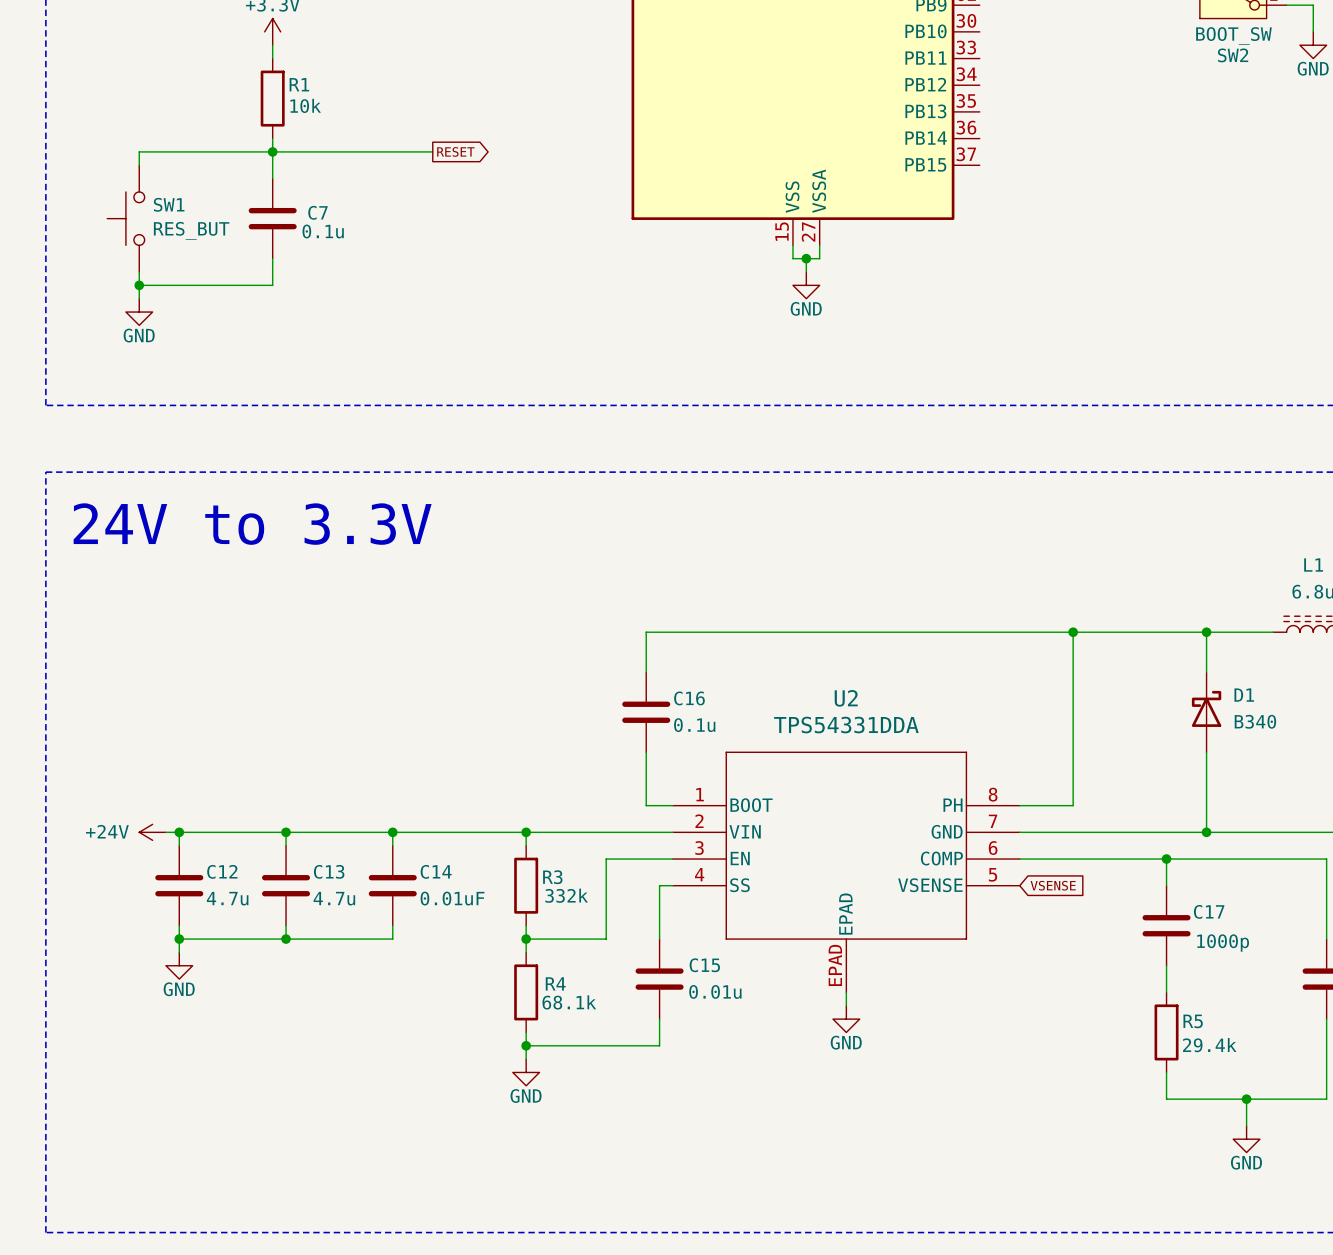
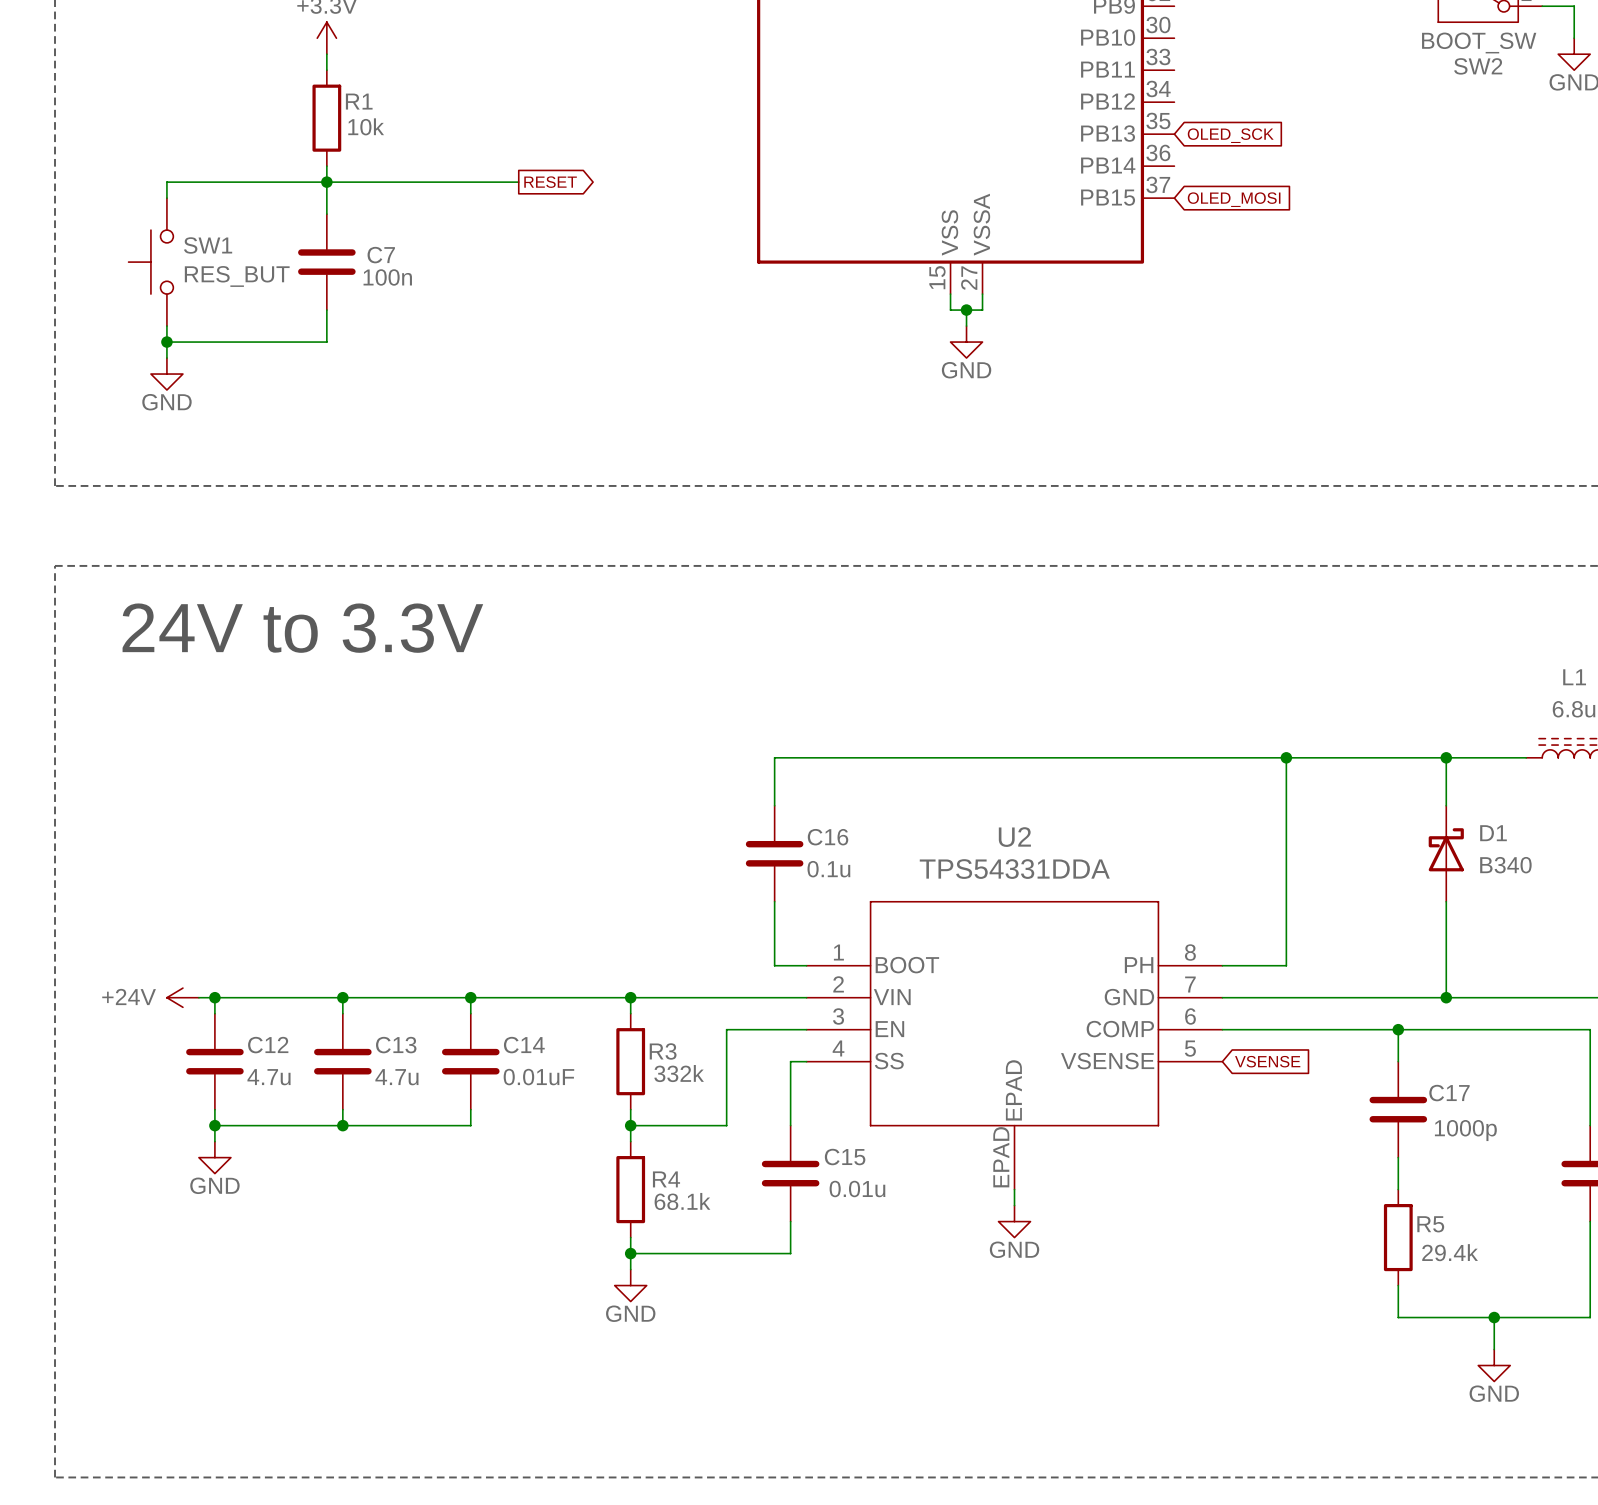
global label: none -> OLED_SCK (1230, 135)
global label: none -> OLED_MOSI (1234, 199)
C7 value: 0.1u (323, 231) -> 100n (387, 277)

